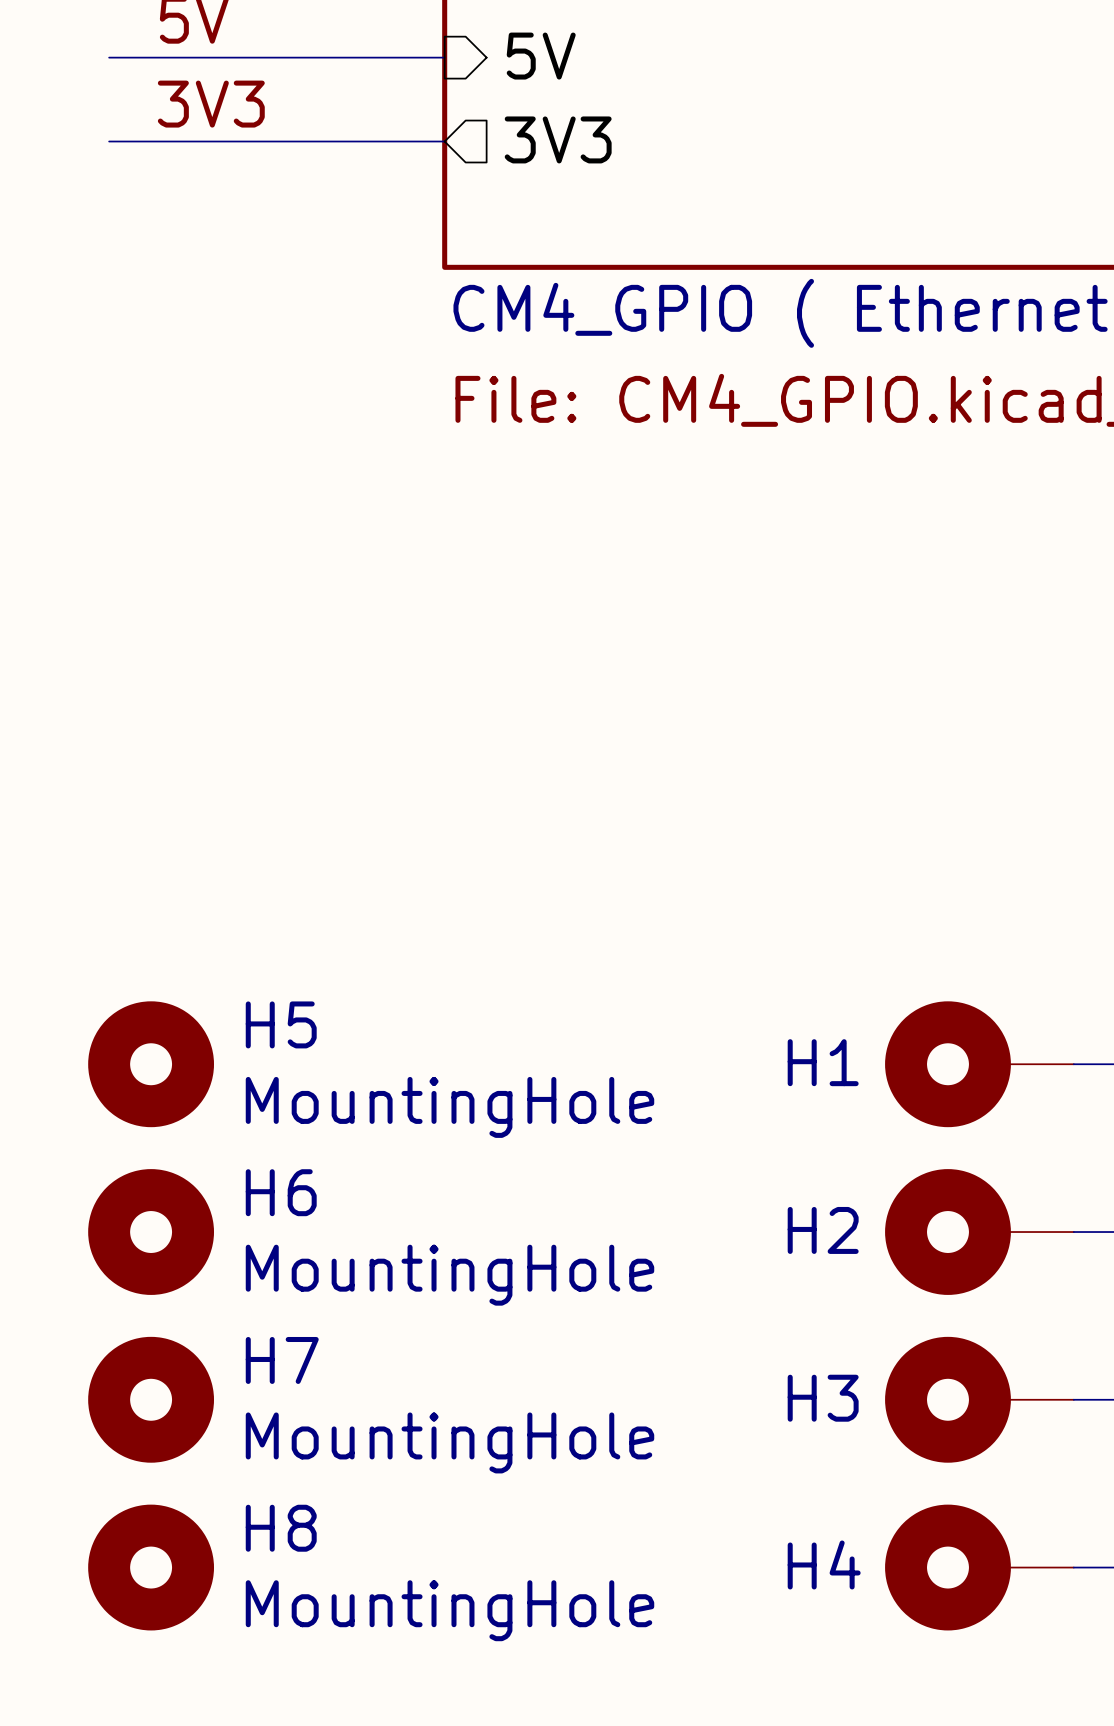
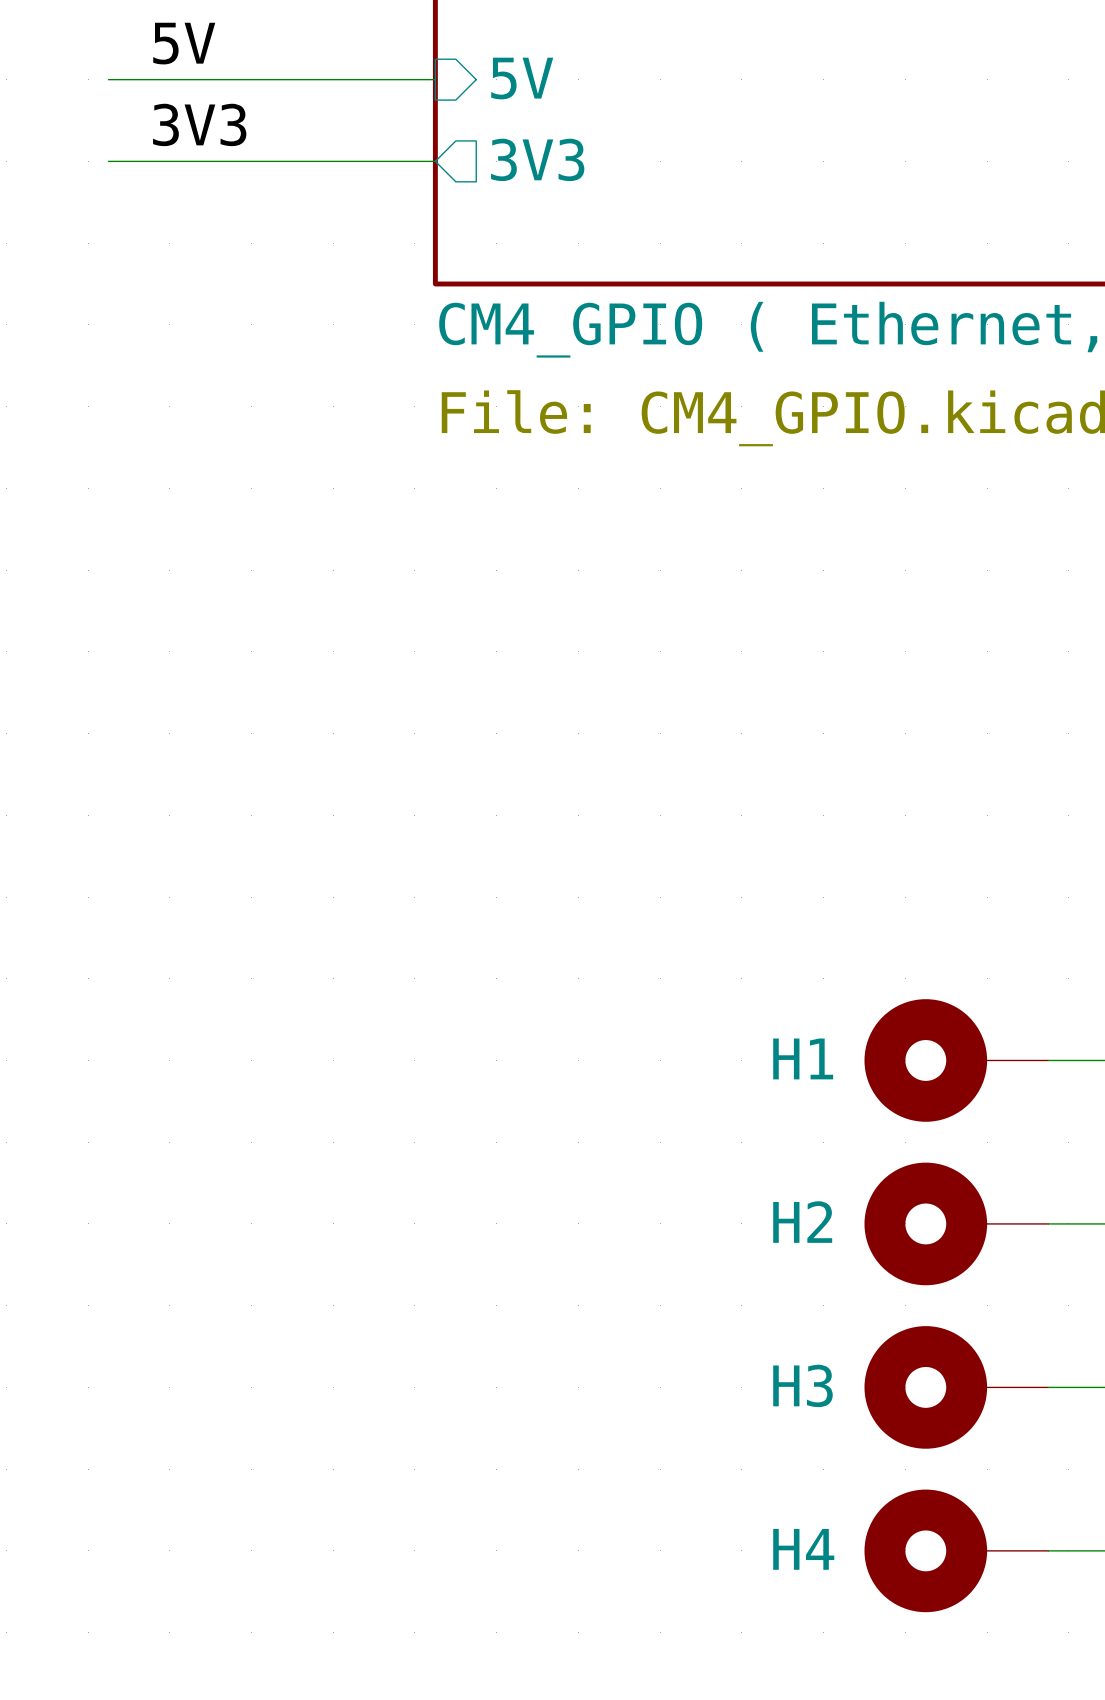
H5: MountingHole (151, 1064) -> none
H6: MountingHole (151, 1232) -> none
H7: MountingHole (151, 1399) -> none
H8: MountingHole (151, 1567) -> none

